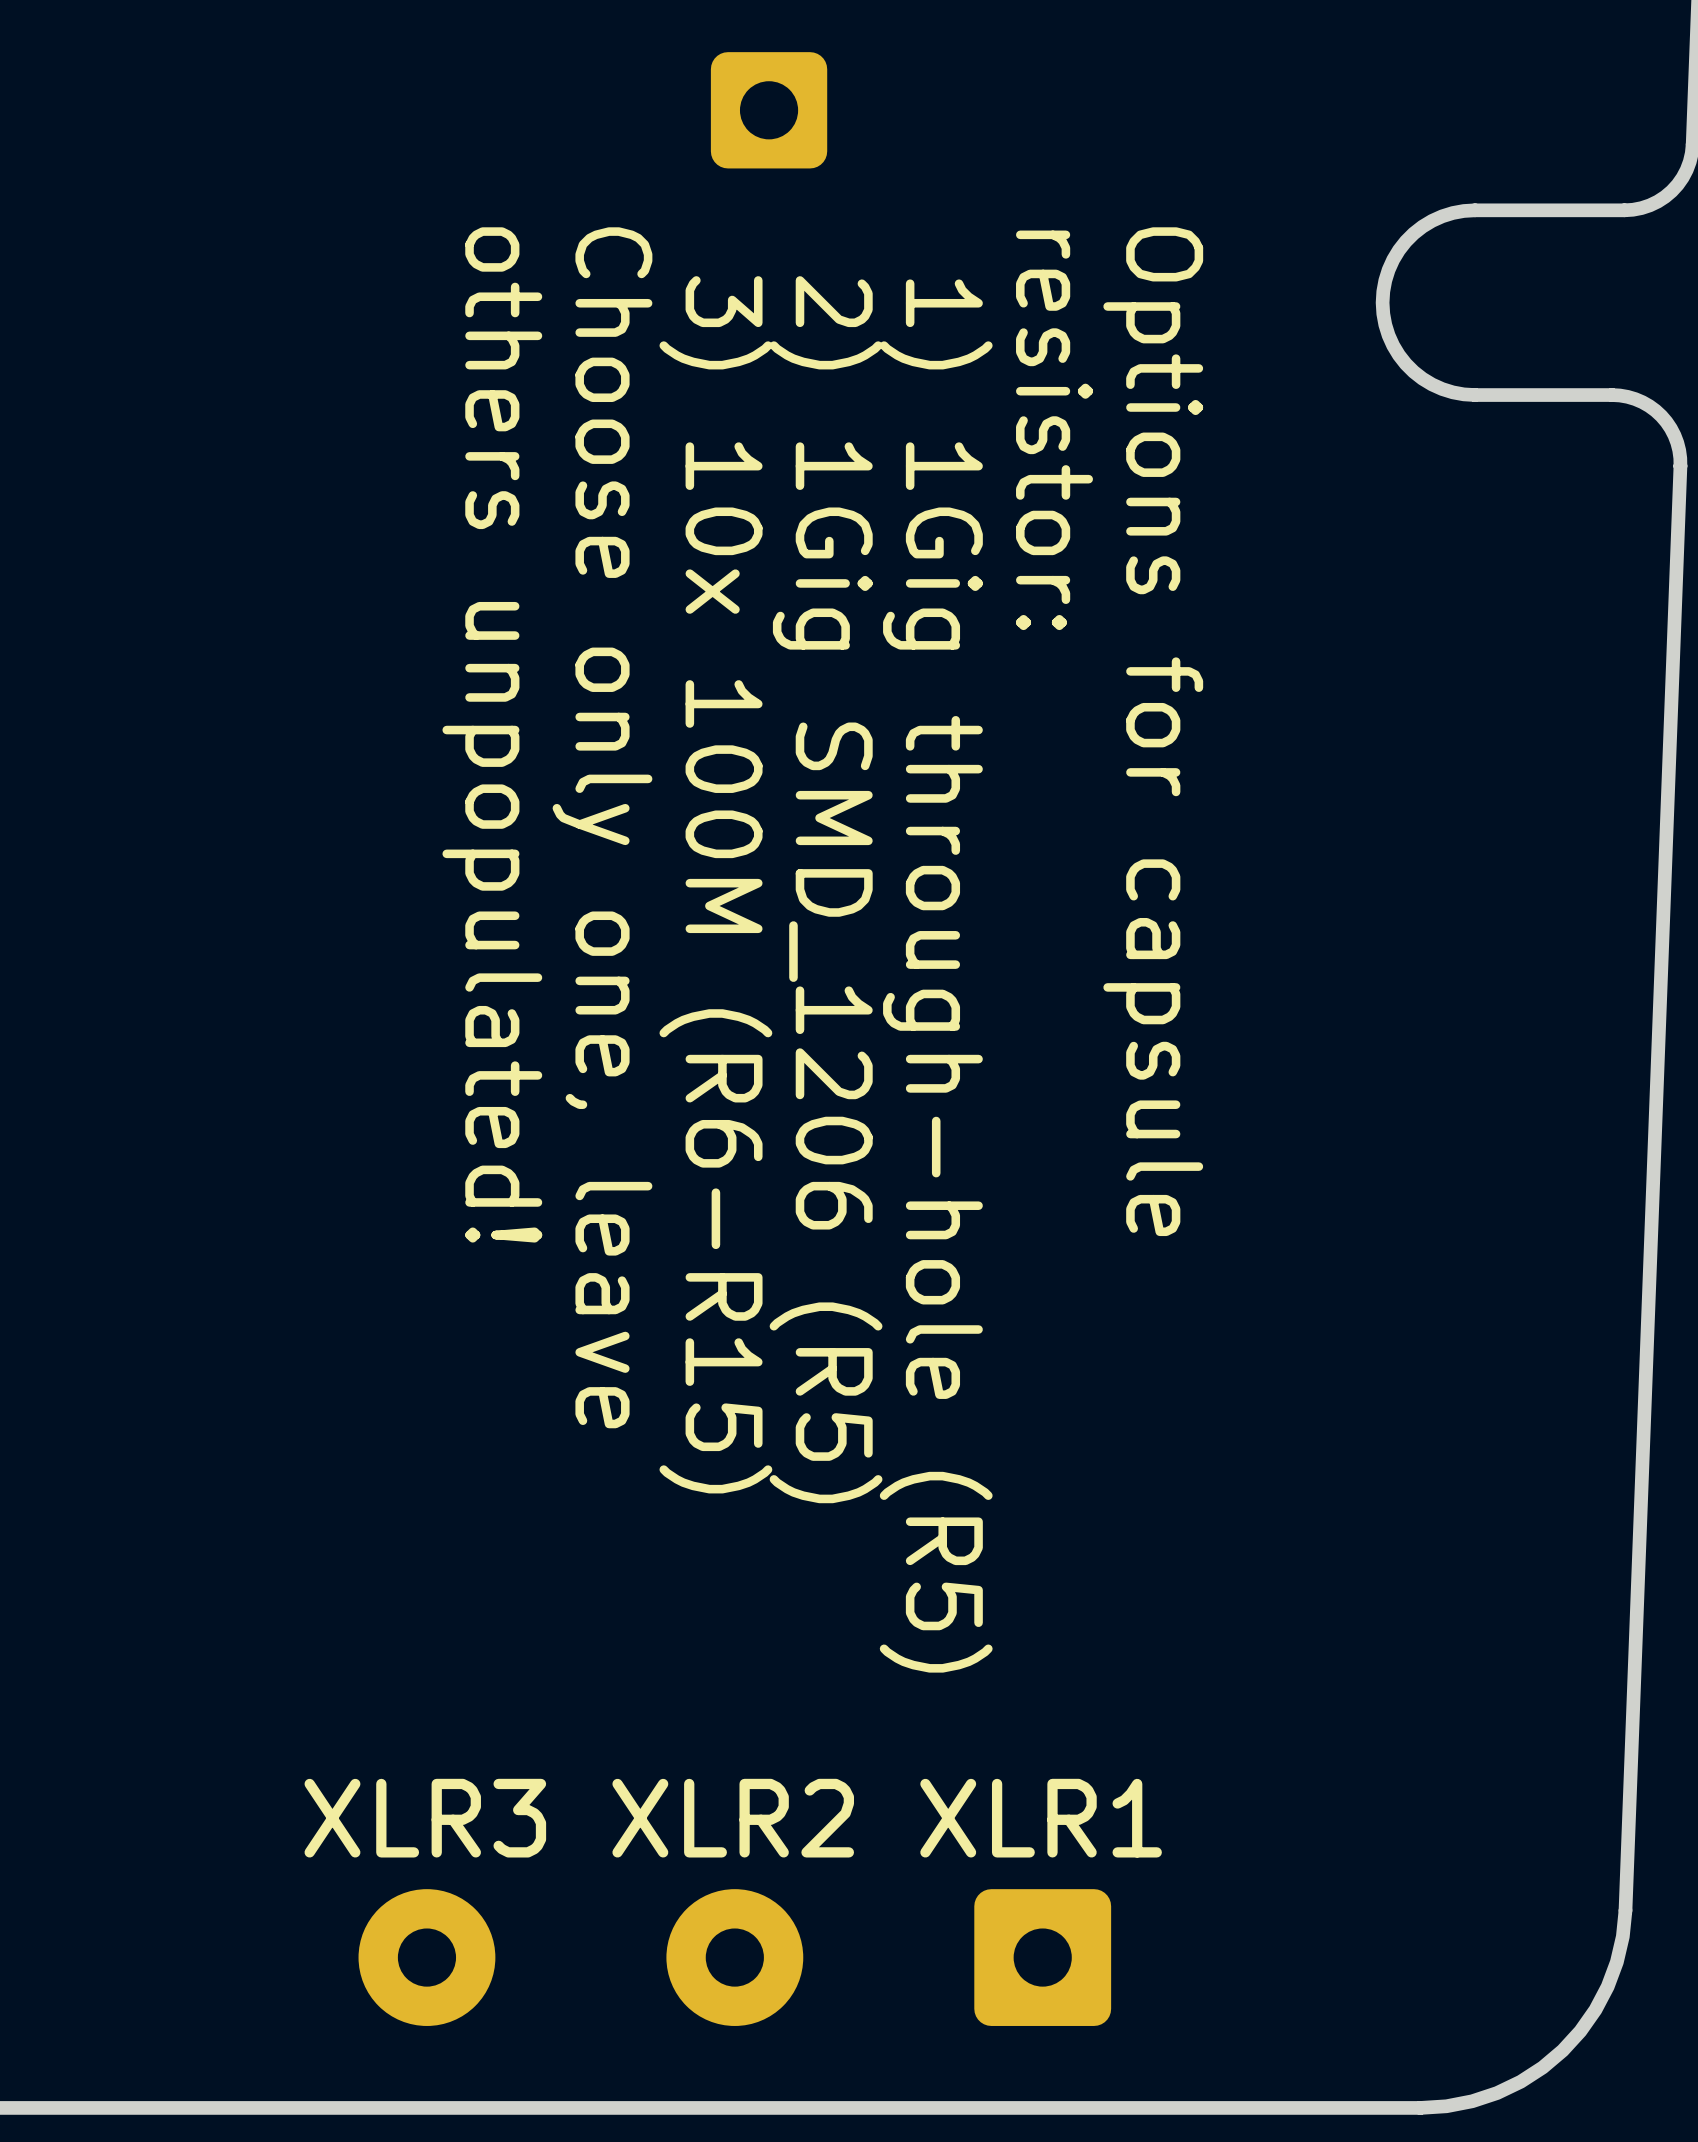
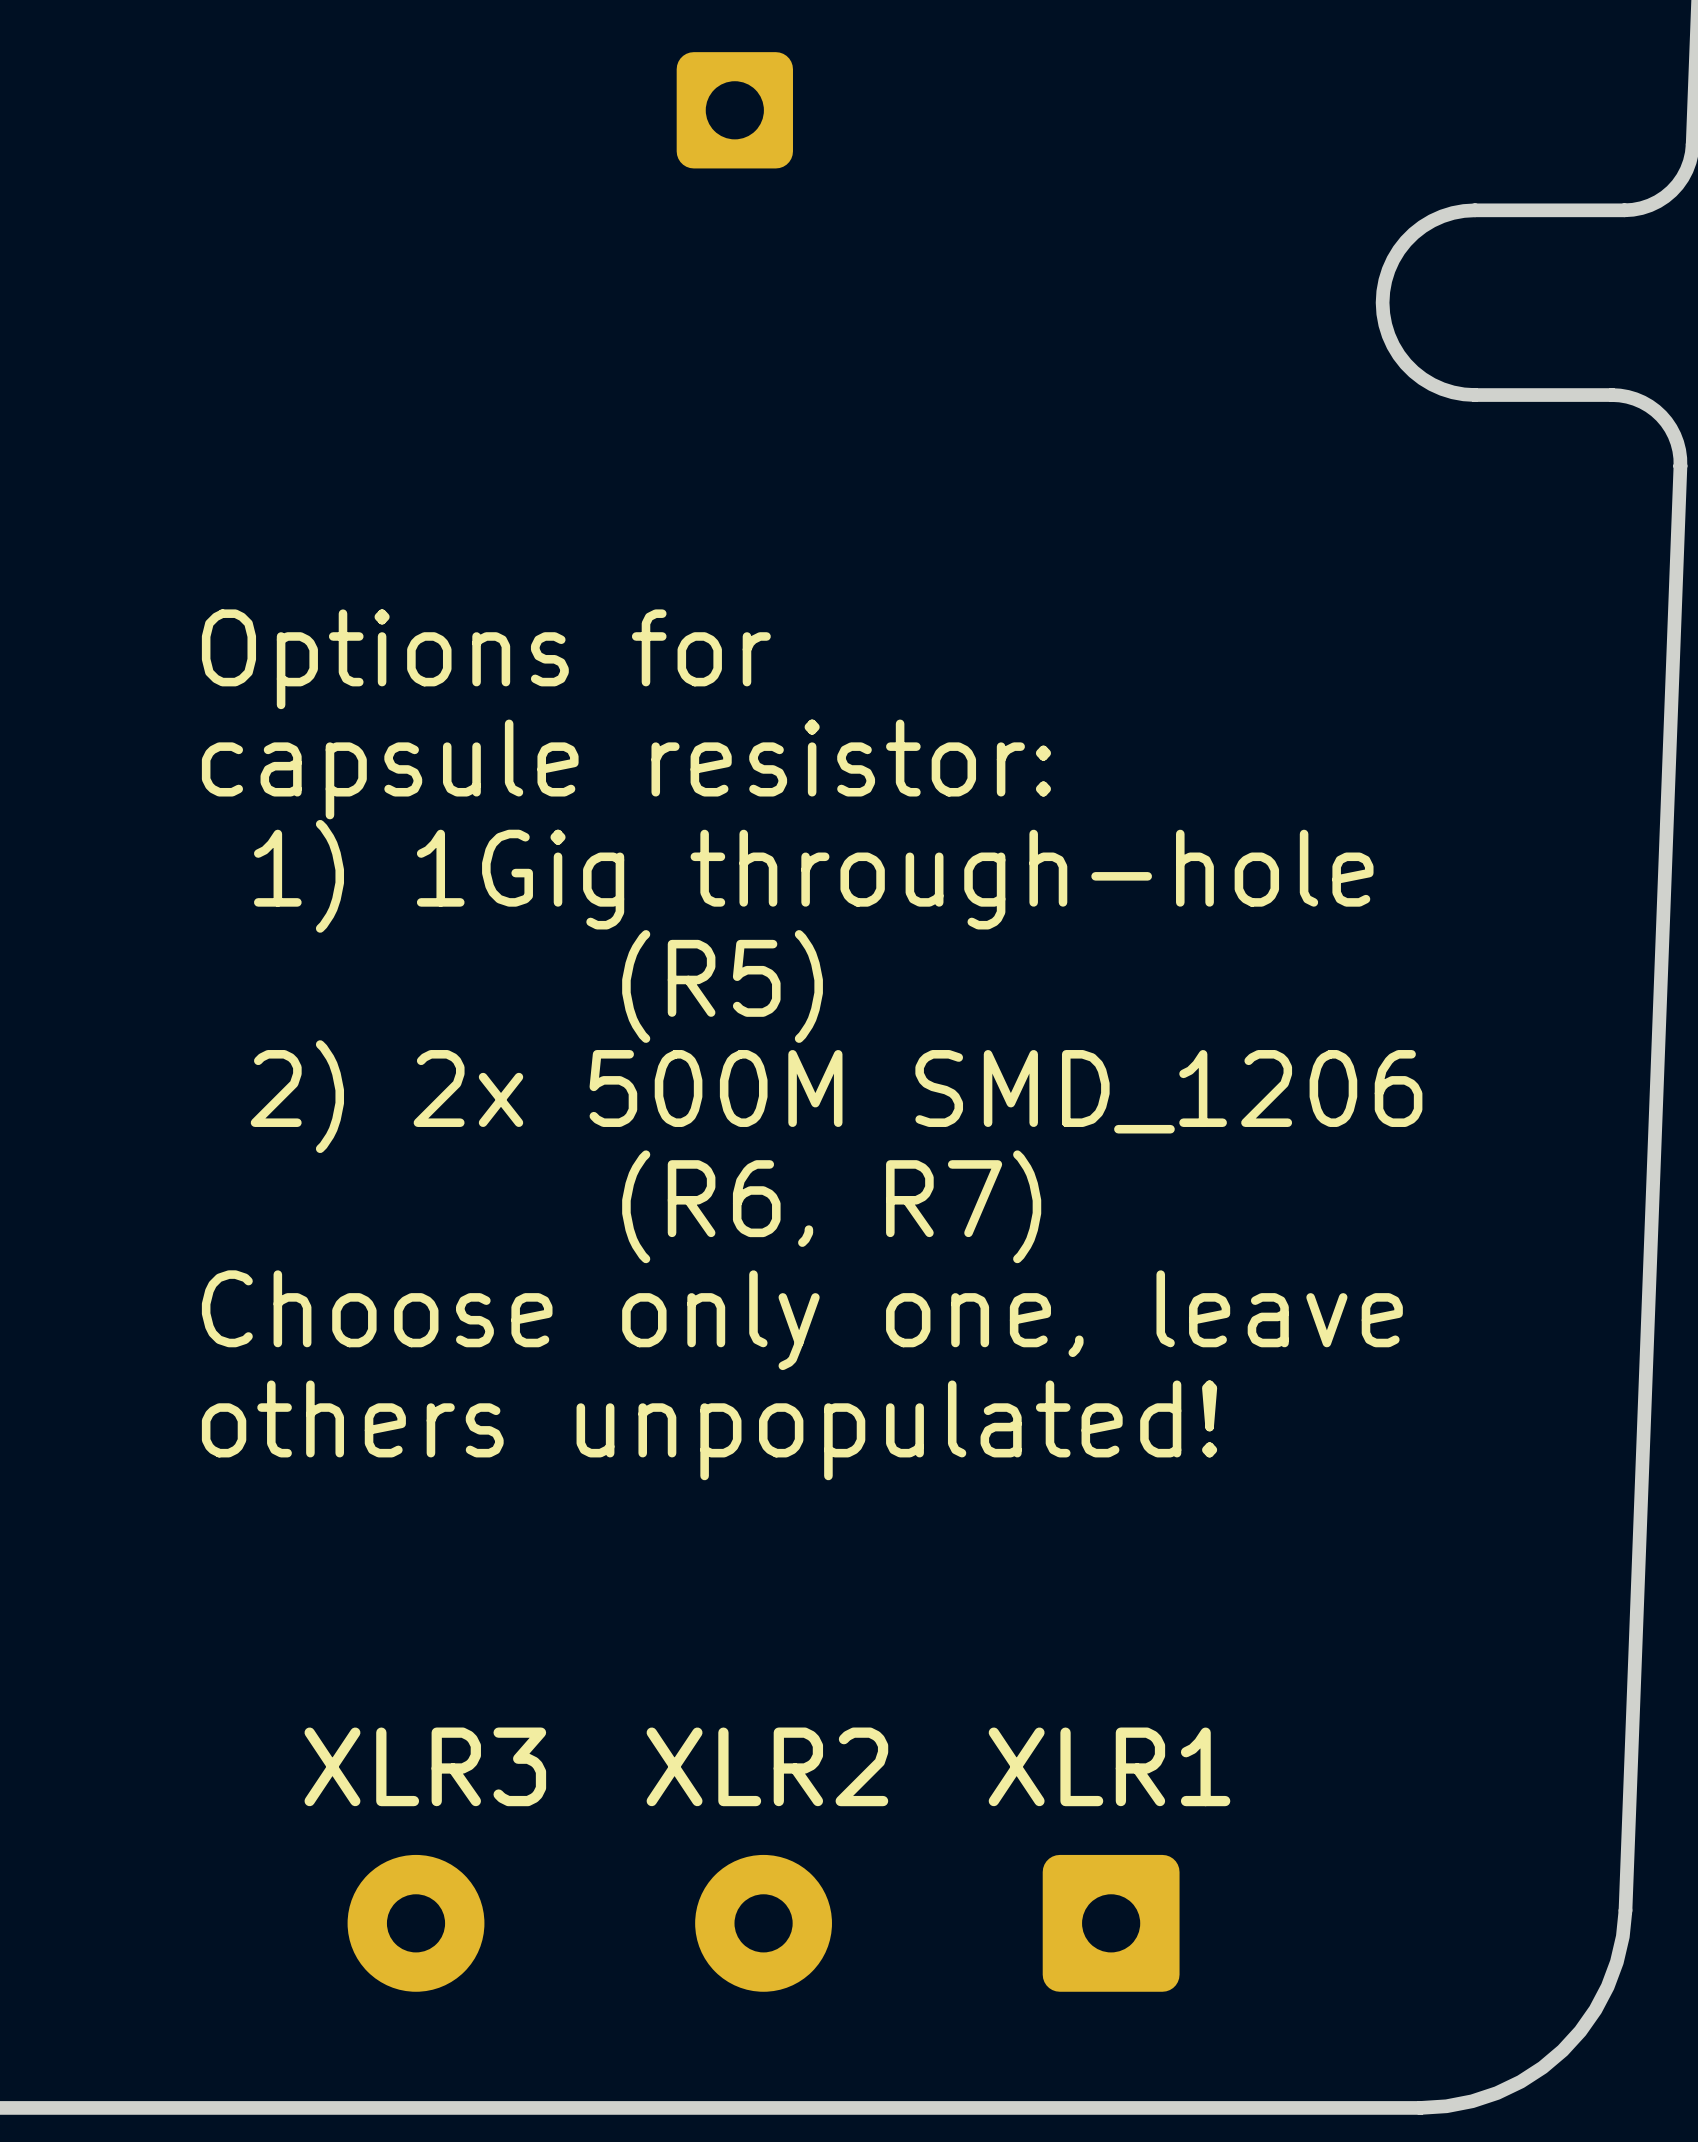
part position: (769, 110) -> (734, 110)
text: resistor: (1054, 430) -> capsule resistor: (626, 769)
text: none -> Options for (486, 659)
text: Options for capsule (1153, 731) -> none
text rotation: 0° (492, 734) -> 90° counterclockwise (709, 1430)
text rotation: 0° (602, 827) -> 90° counterclockwise (802, 1320)
text: 3) 10x 100M (R6-R15) (715, 884) -> none
text: 2) 1Gig SMD_1206 (R5) (826, 889) -> 2) 2x 500M SMD_1206 (836, 1096)
text: 1) 1Gig through-hole (R5) (936, 976) -> 1) 1Gig through-hole (813, 876)
text: none -> (R5) (722, 986)
text: none -> (R6, R7) (831, 1206)
text position: XLR3 (425, 1818) -> XLR3 (425, 1766)
text position: XLR2 (733, 1818) -> XLR2 (767, 1766)
text position: XLR1 (1041, 1818) -> XLR1 (1109, 1766)
part position: (426, 1957) -> (416, 1923)
part position: (734, 1957) -> (763, 1923)
part position: (1042, 1957) -> (1111, 1923)

